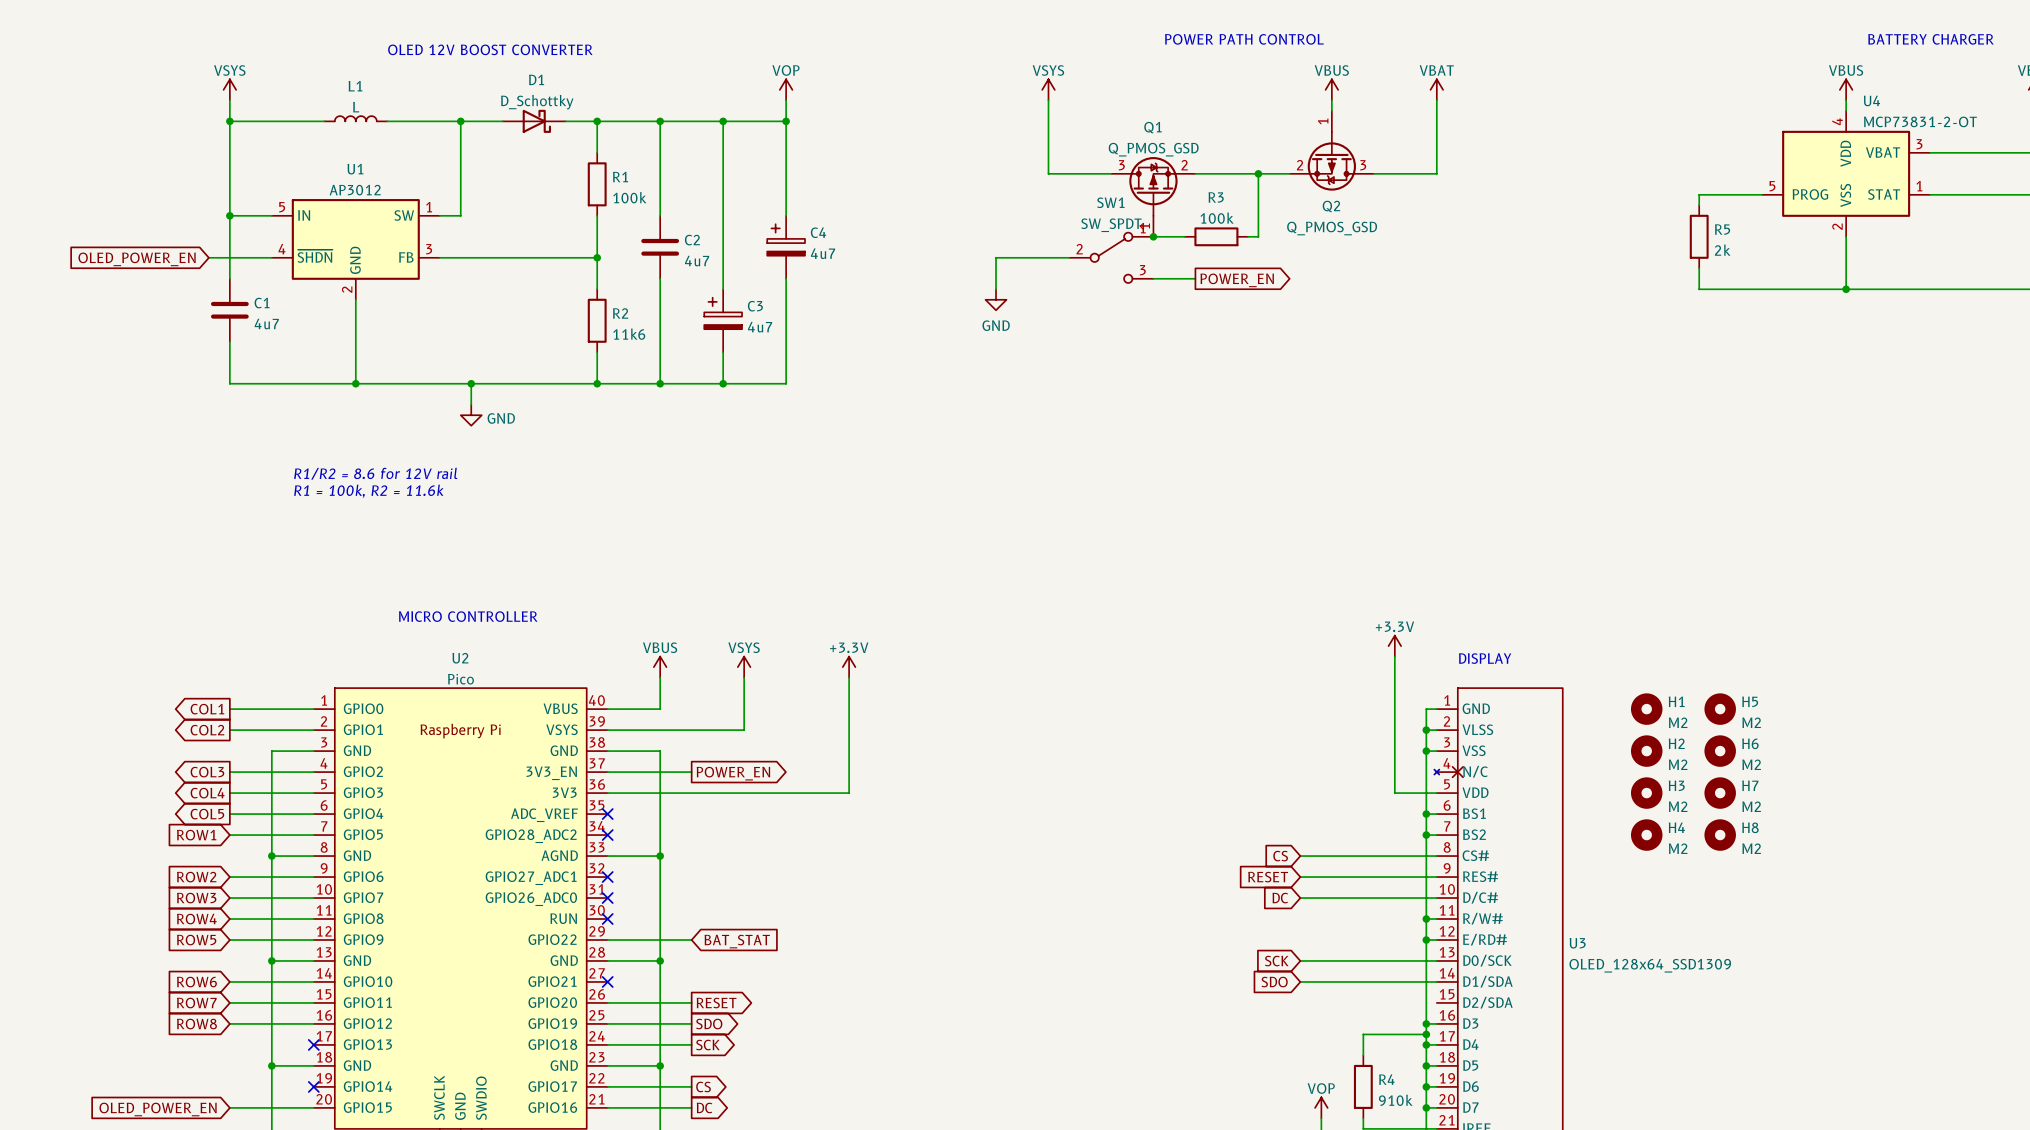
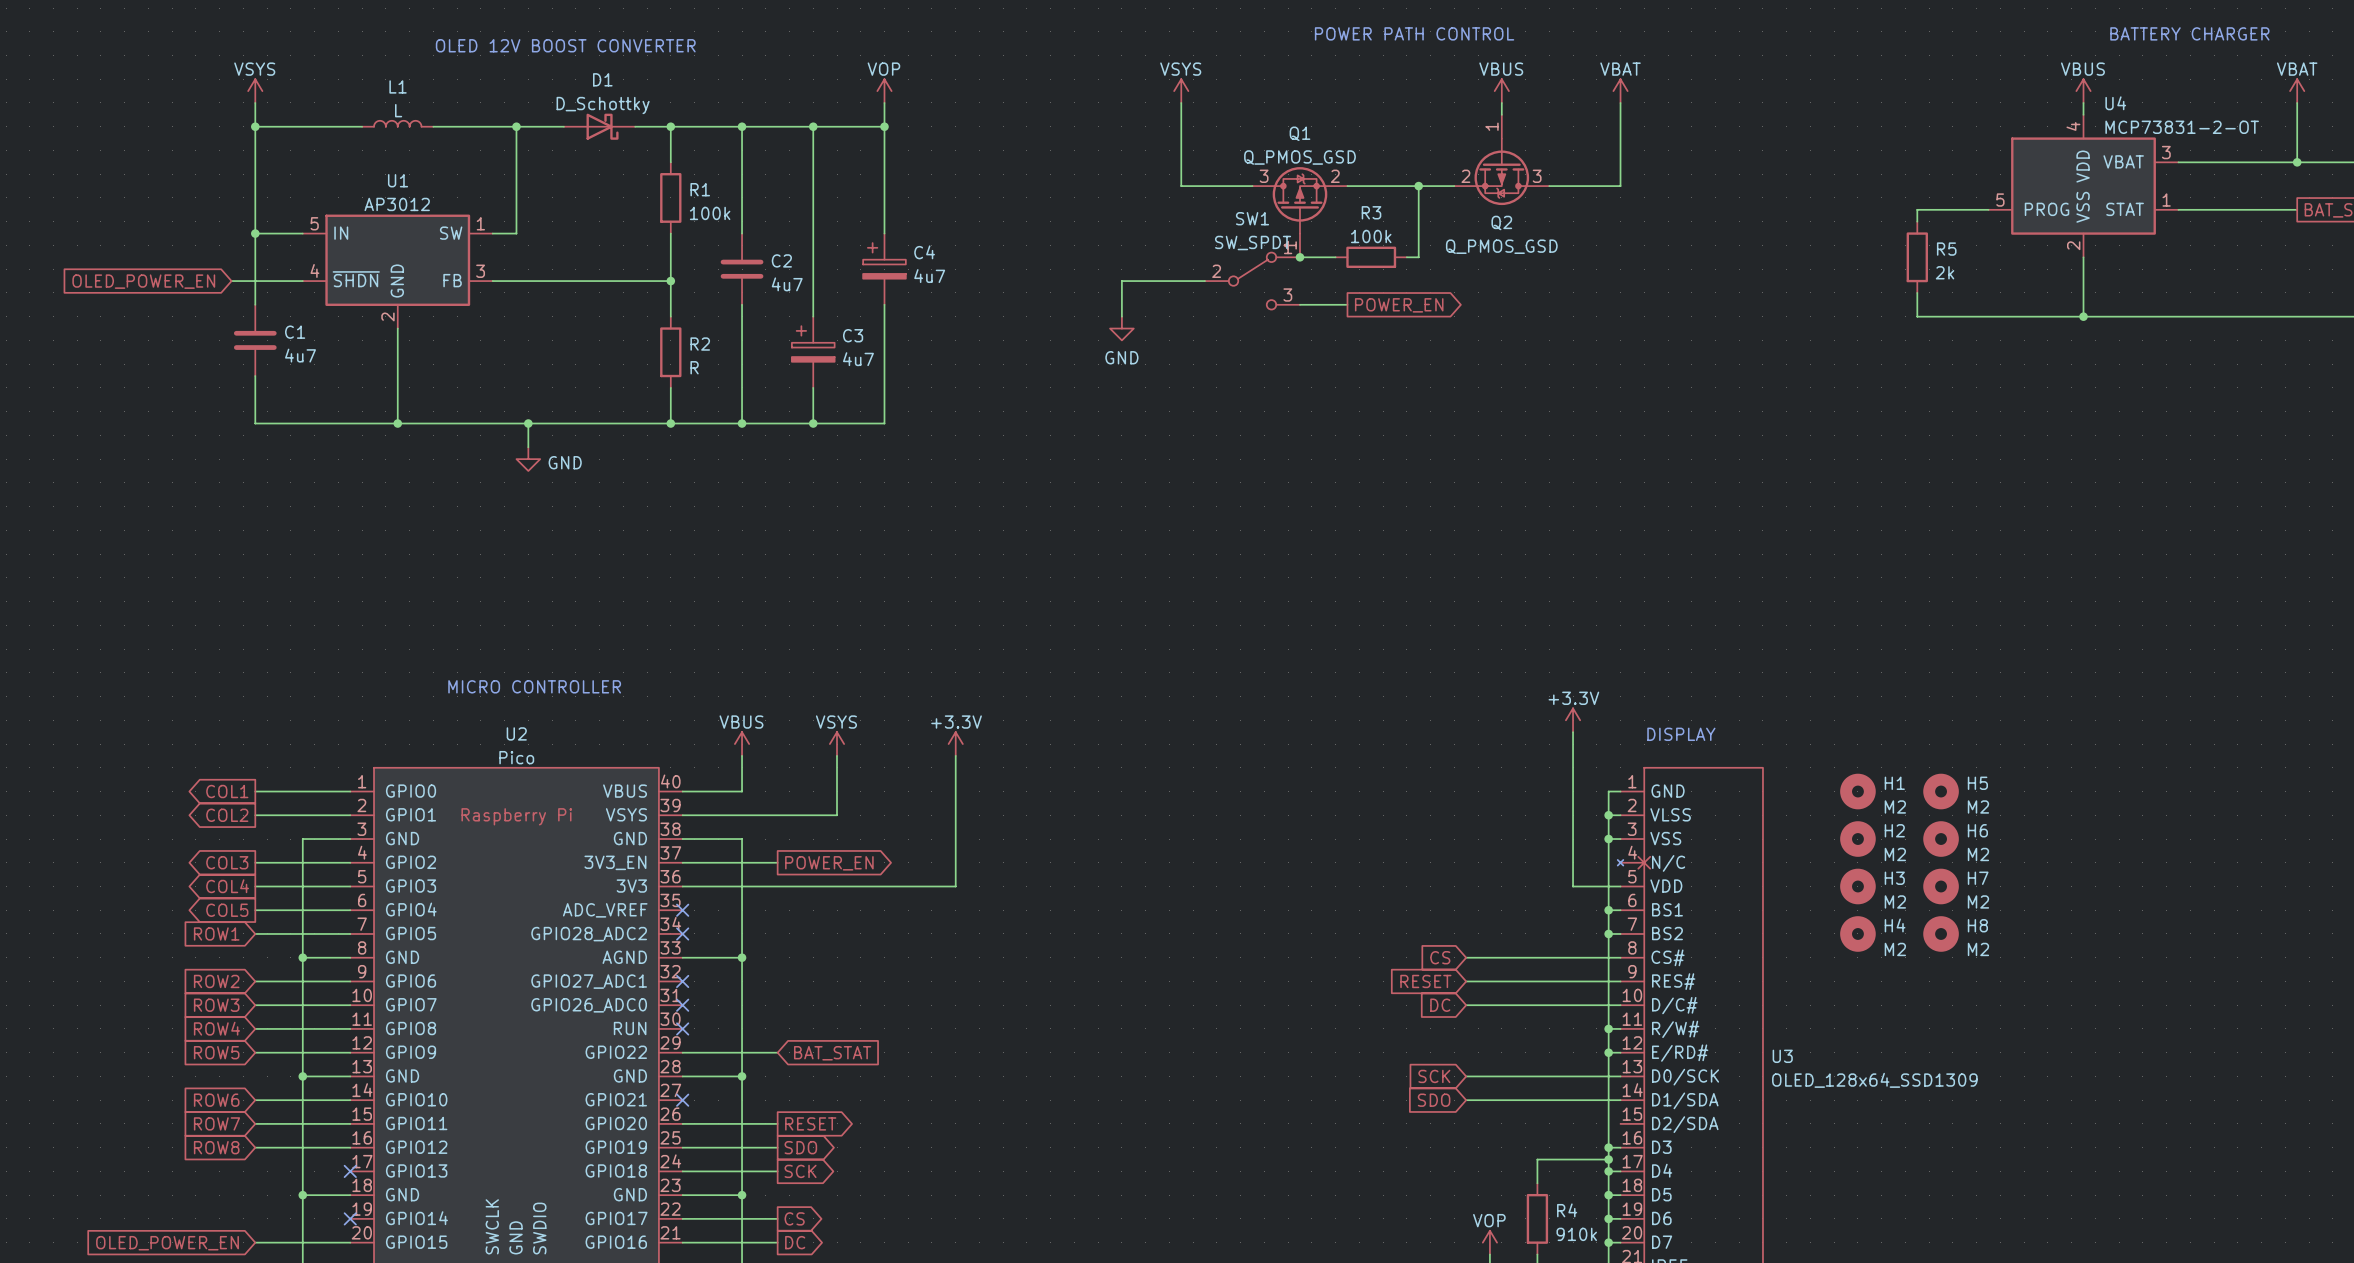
R2 value: 11k6 (629, 334) -> R (694, 367)
text: R1/R2 = 8.6 for 12V rail (375, 473) -> none
text: R1 = 100k, R2 = 11.6k (368, 491) -> none

